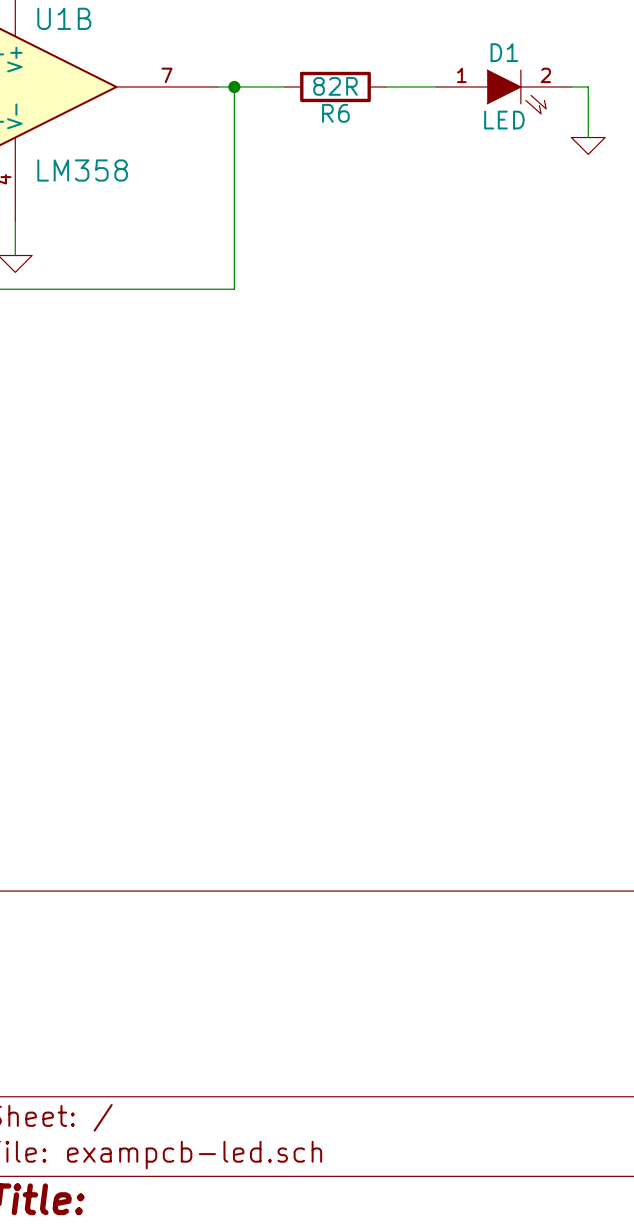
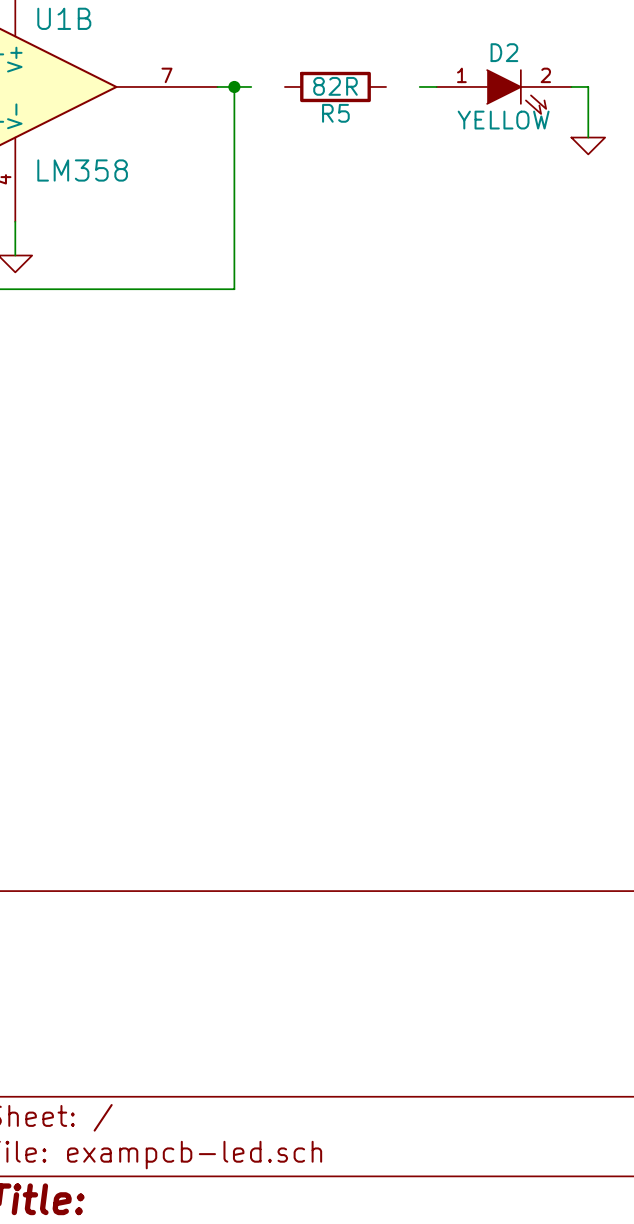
D1 name: D1 (504, 52) -> D2 (504, 52)
wire: (251, 86) (284, 86) -> none
wire: (386, 86) (419, 86) -> none
R6 name: R6 (335, 113) -> R5 (335, 113)
D1 value: LED (504, 120) -> YELLOW (503, 120)

